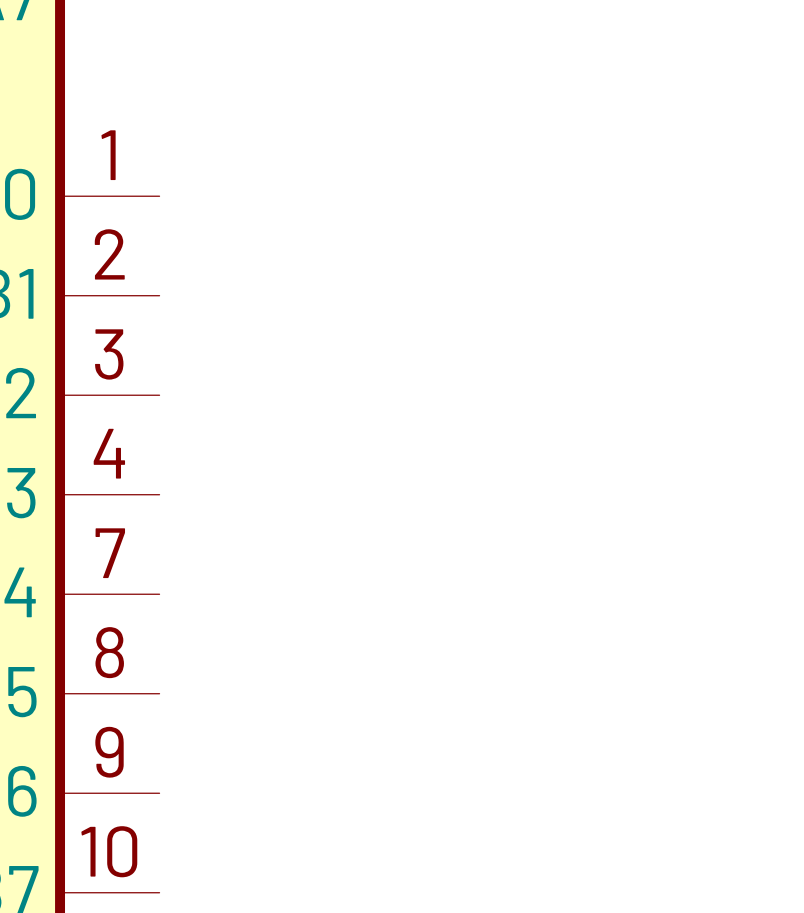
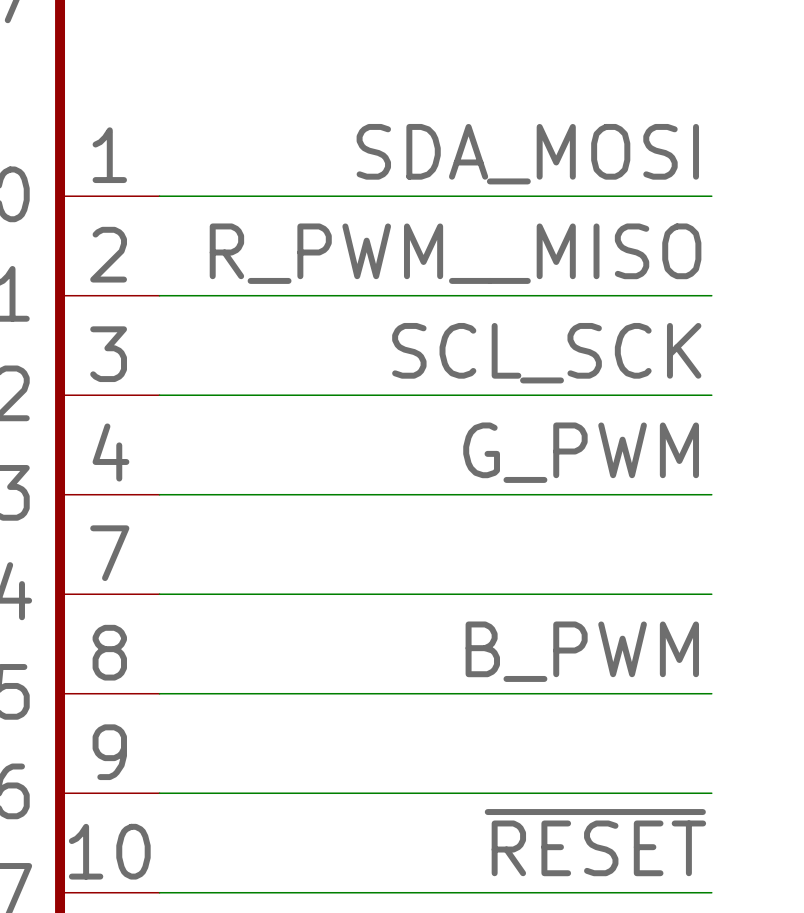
label: none -> SDA_MOSI (527, 154)
wire: none -> (159, 196) (711, 196)
label: none -> R_PWM__MISO (455, 253)
wire: none -> (159, 295) (711, 295)
label: none -> SCL_SCK (546, 353)
wire: none -> (159, 395) (711, 395)
label: none -> G_PWM (581, 452)
wire: none -> (159, 494) (711, 494)
wire: none -> (159, 594) (711, 594)
label: none -> B_PWM (582, 651)
wire: none -> (159, 693) (711, 693)
wire: none -> (159, 793) (711, 793)
label: none -> ~{RESET} (595, 842)
wire: none -> (159, 892) (711, 892)

